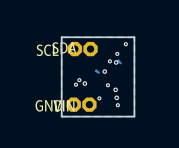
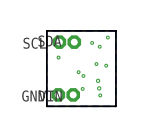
via: none -> (92, 42)
via: (109, 61) -> none
track: (116, 62) (118, 60) (120, 63) -> none
via: (116, 62) -> none
via: none -> (58, 57)
track: (96, 70) (98, 72) -> none
via: (104, 71) -> none
via: none -> (96, 64)
via: none -> (106, 65)
via: (79, 80) -> none
via: none -> (78, 72)
via: (84, 83) -> none
via: (75, 84) -> none
via: none -> (83, 75)
via: (107, 85) -> none

